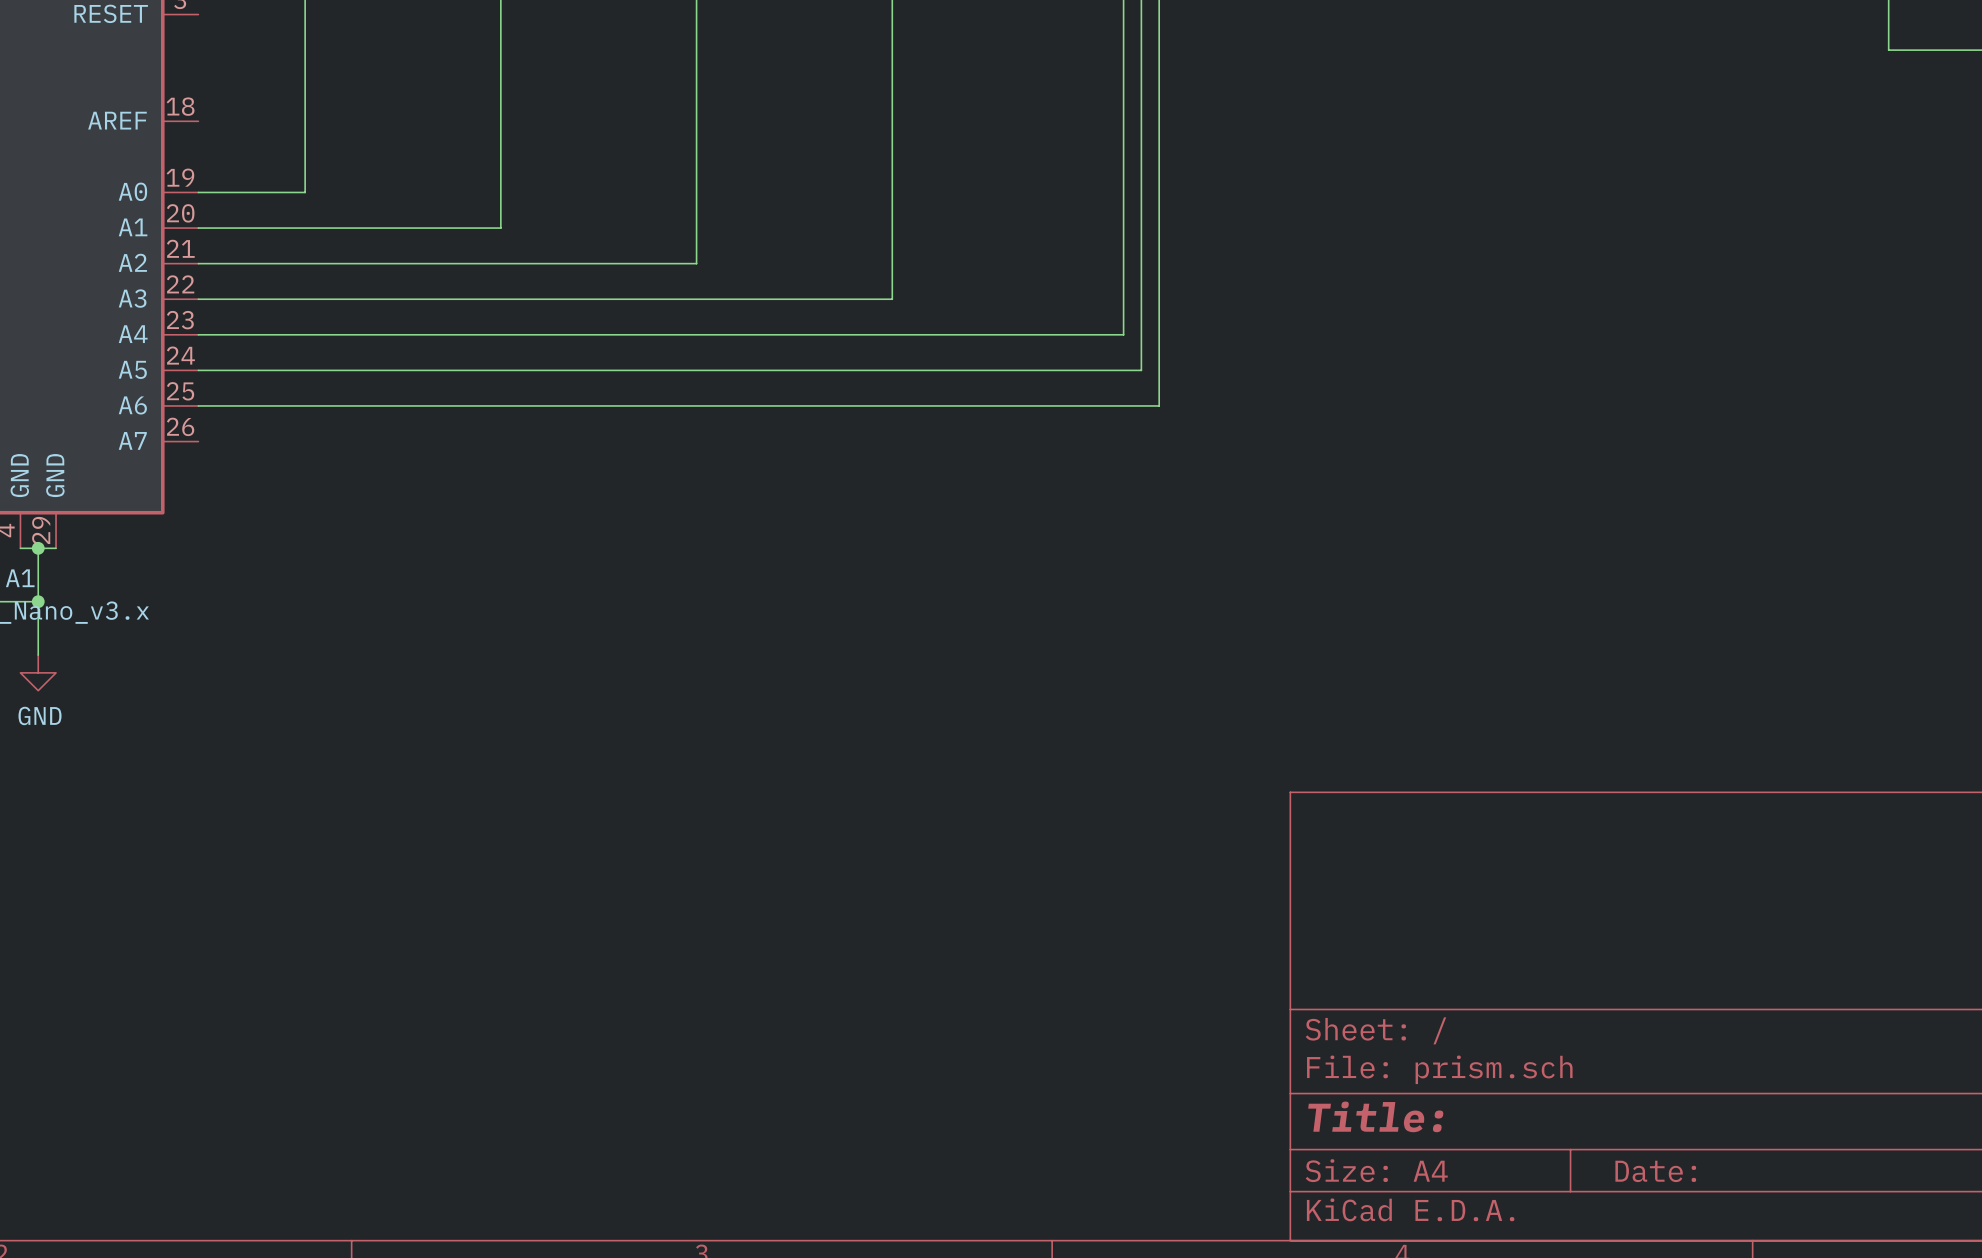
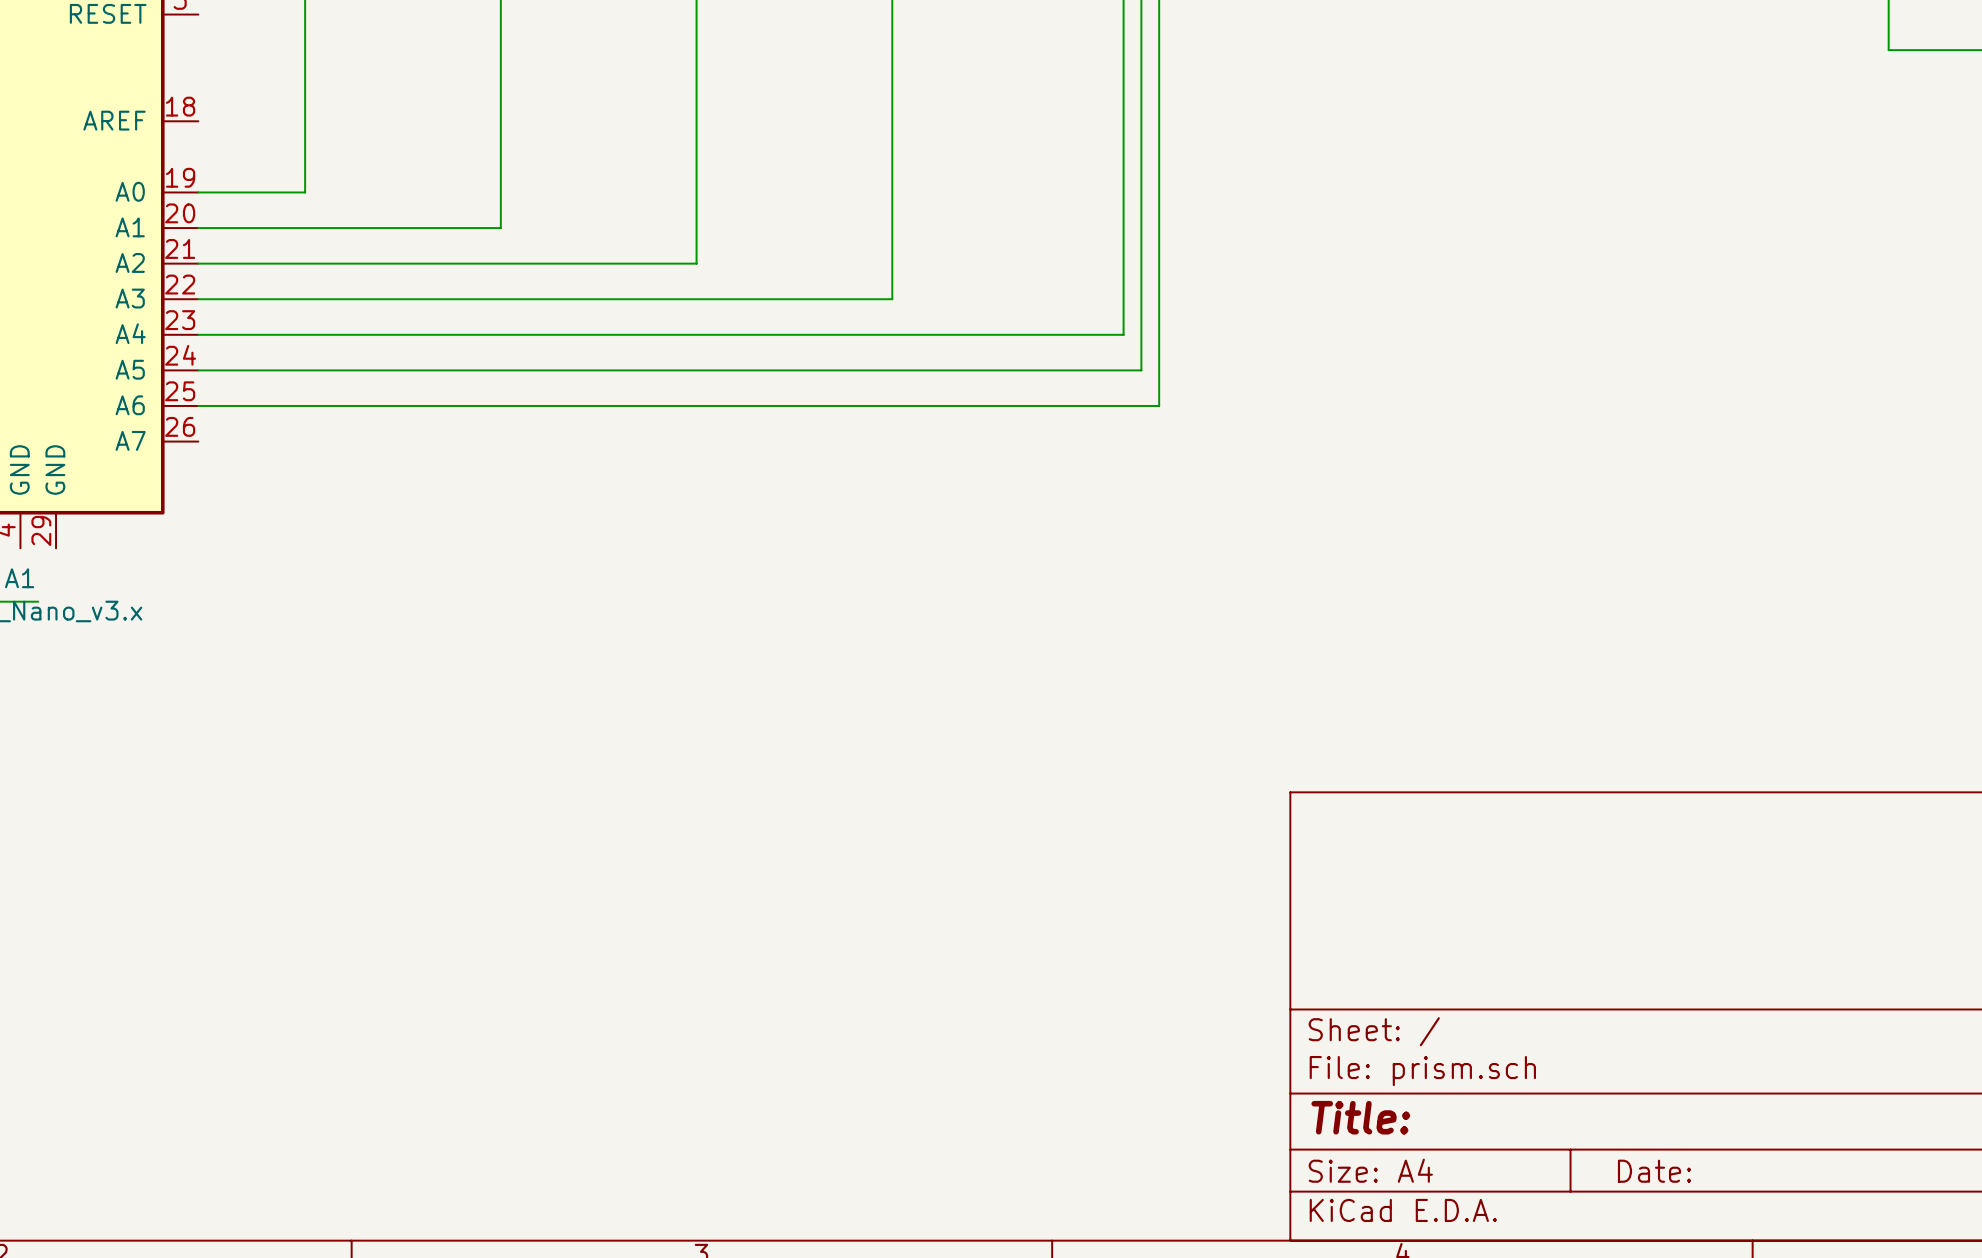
wire: (20, 548) (56, 548) -> none
wire: (38, 548) (38, 655) -> none
junction: (38, 548) -> none
junction: (38, 601) -> none
power symbol: GND (38, 672) -> none

